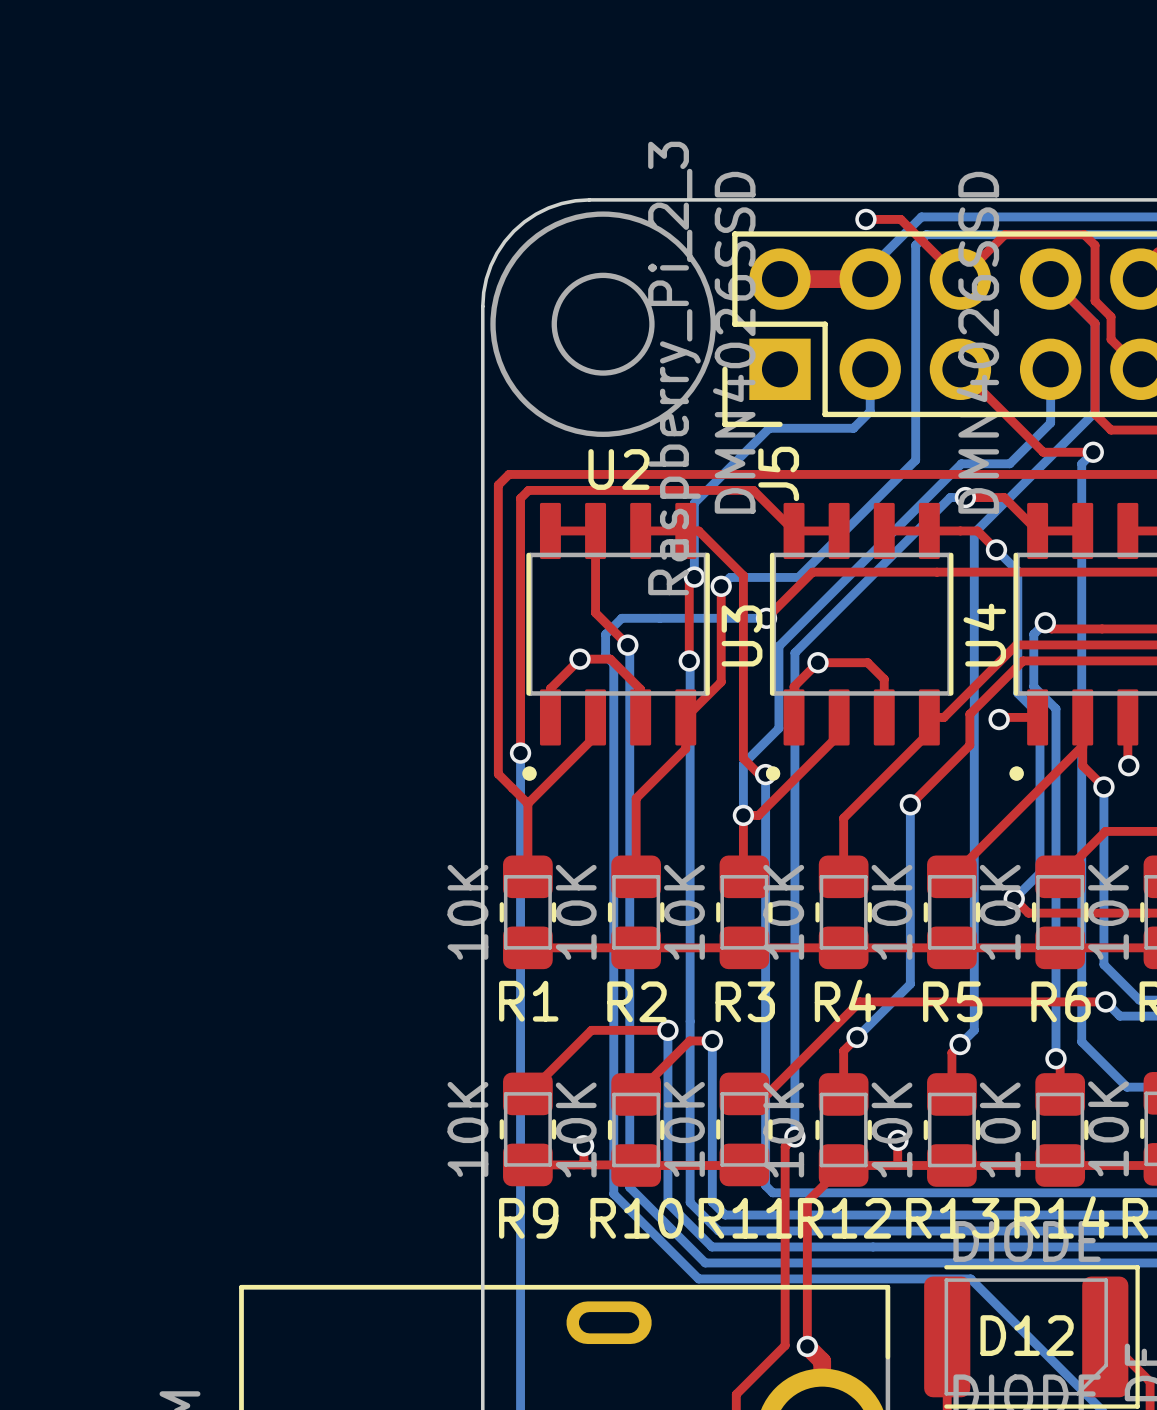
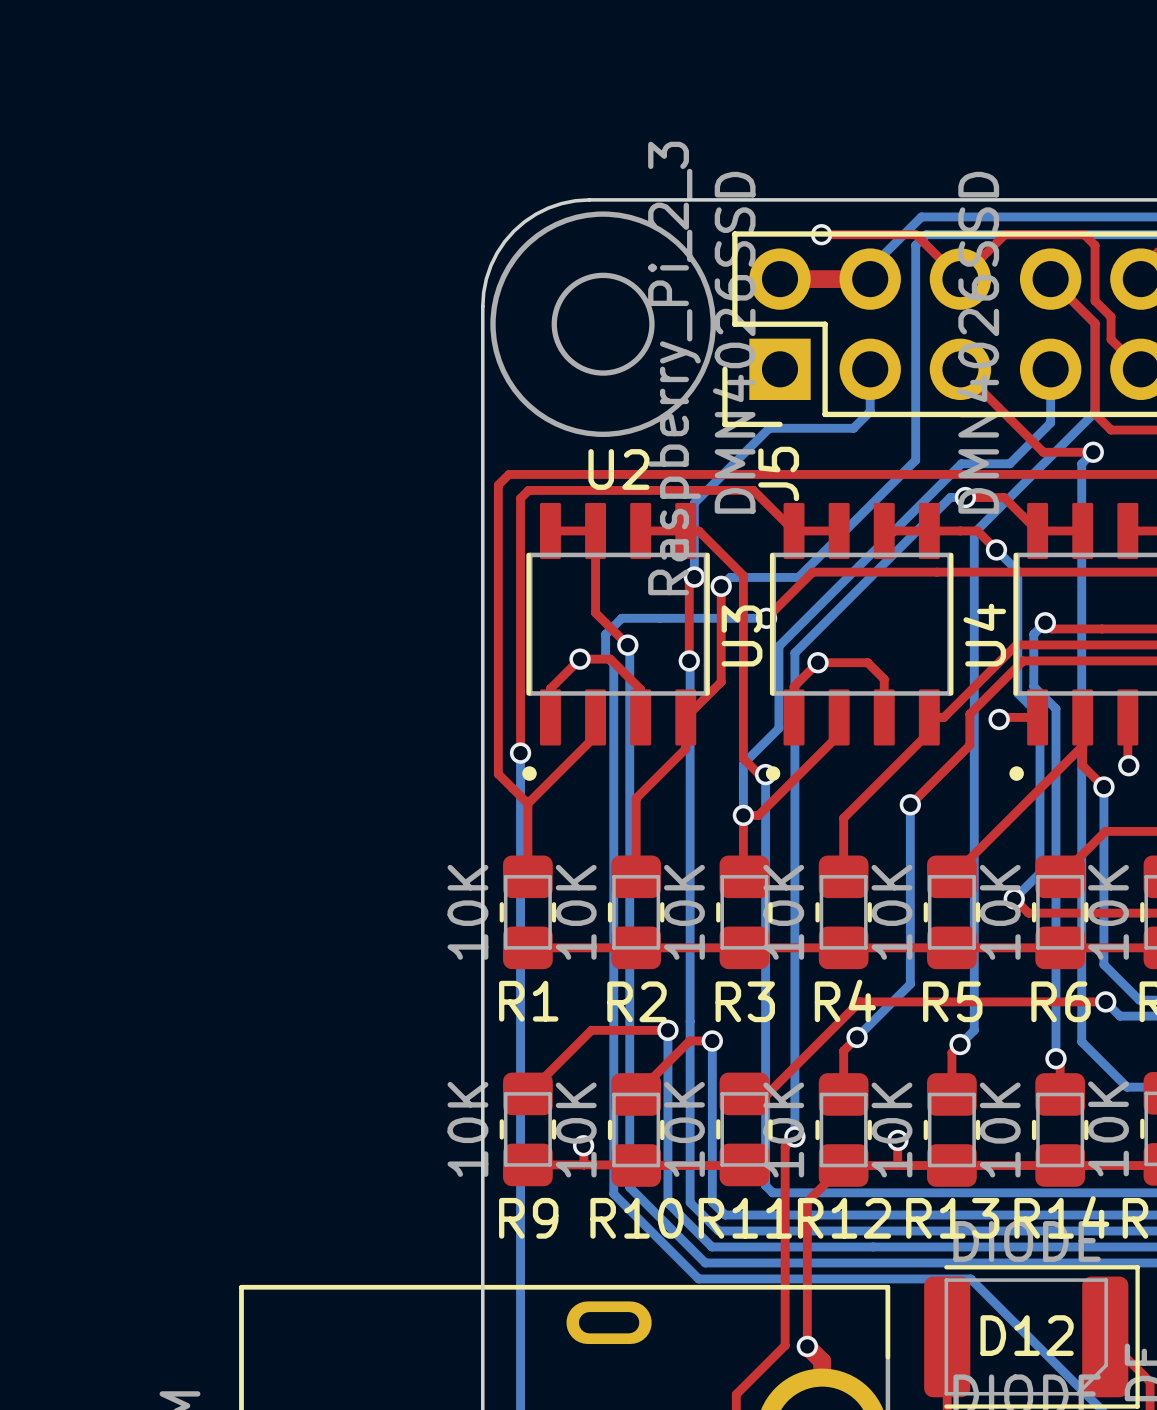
top track: (865, 219) (900, 219) (916, 234) -> (821, 234) (916, 234)
via position: (865, 219) -> (821, 234)

